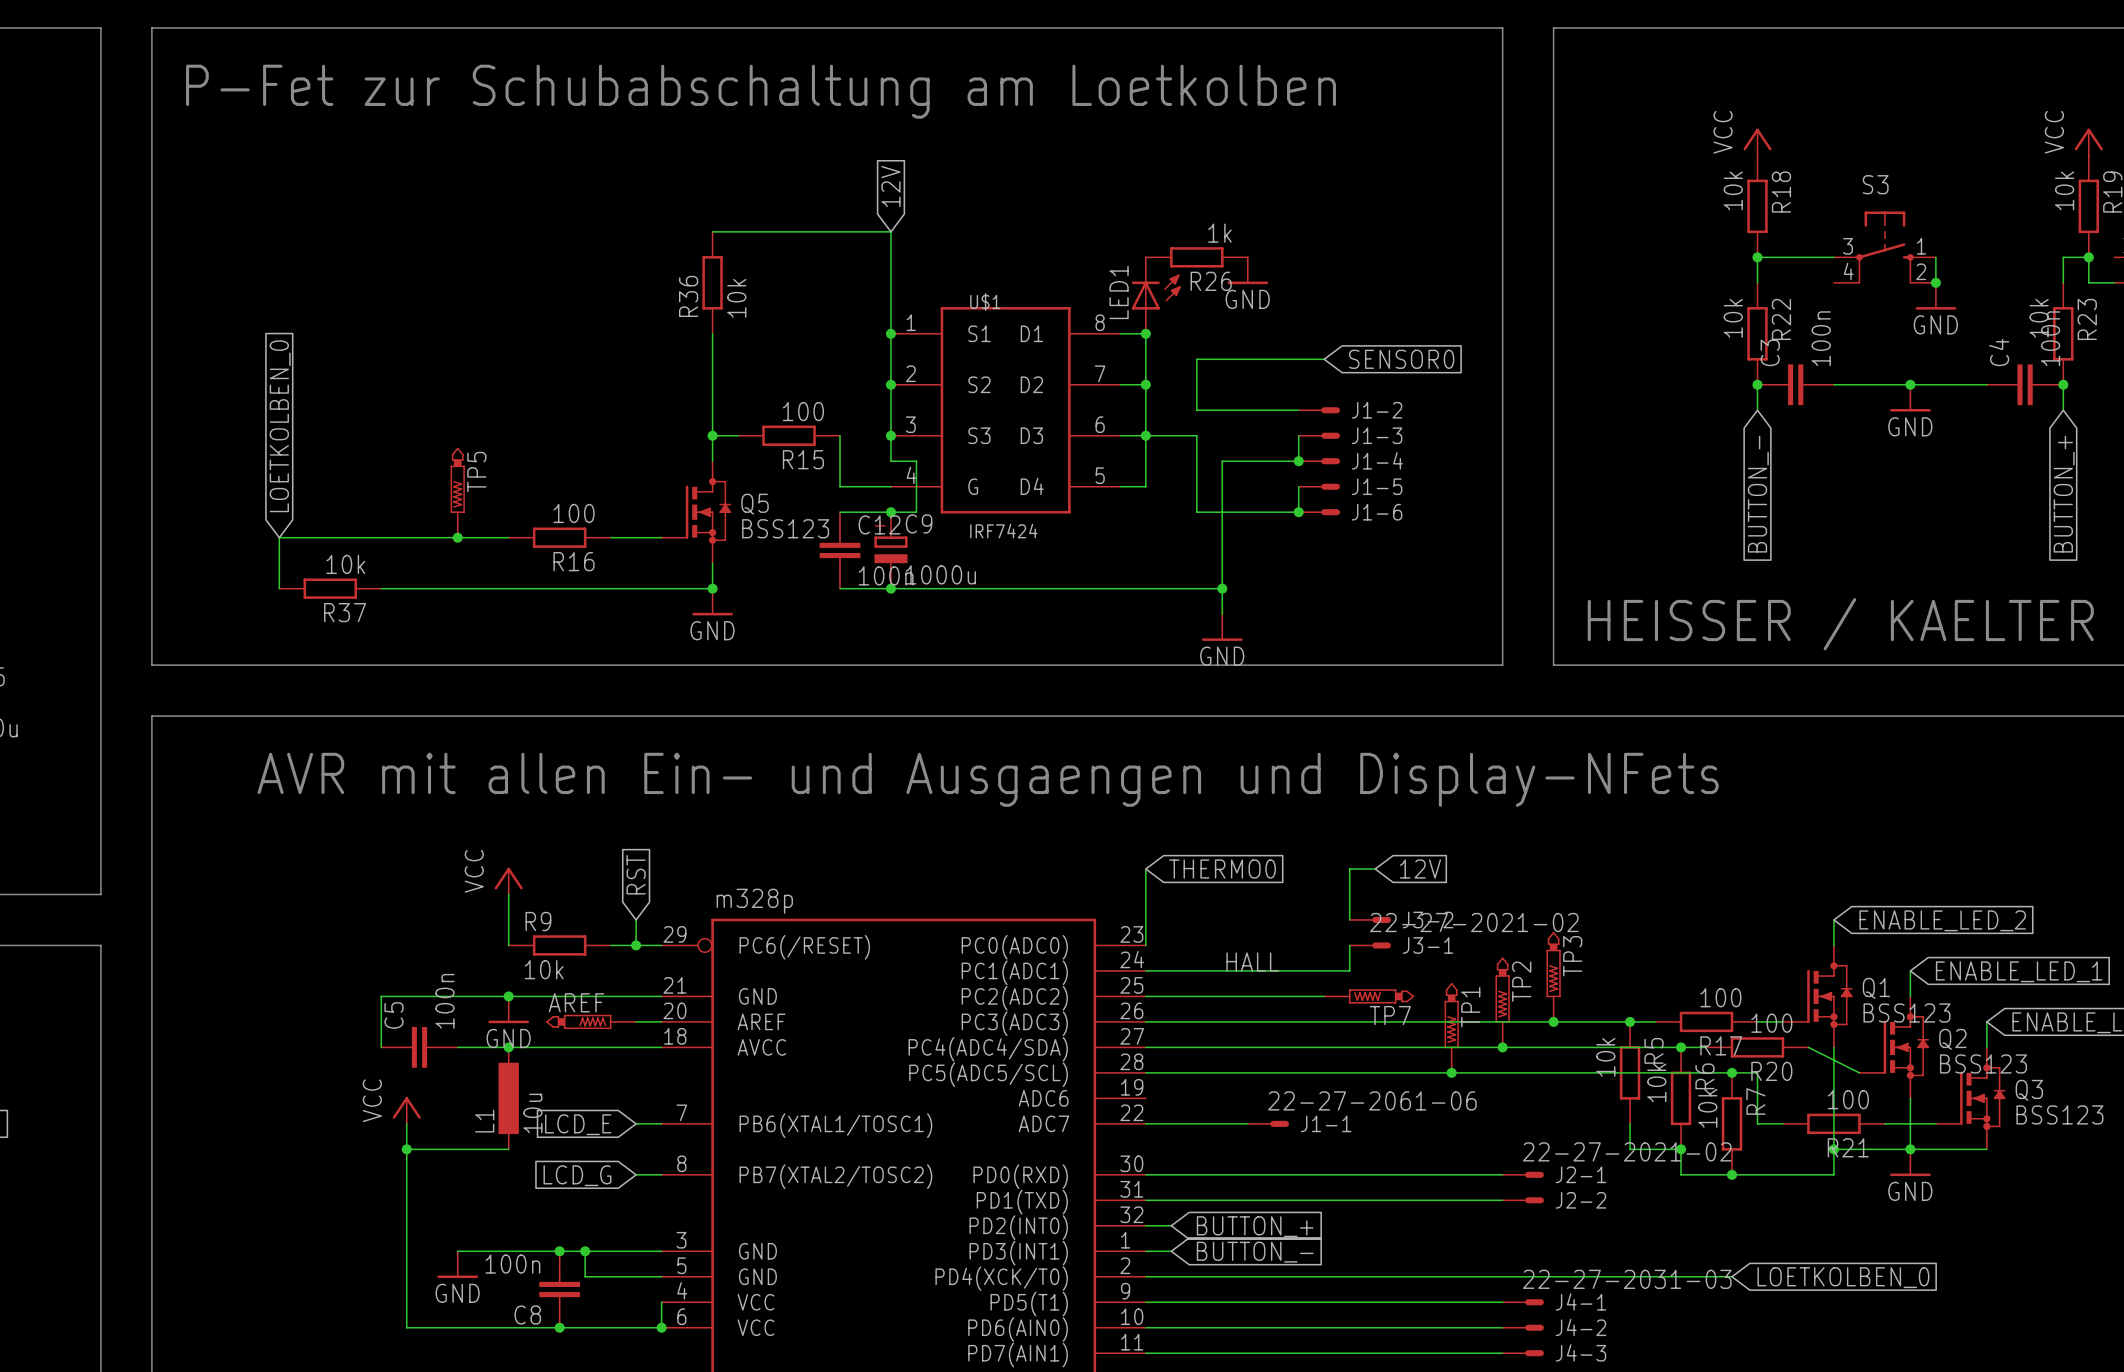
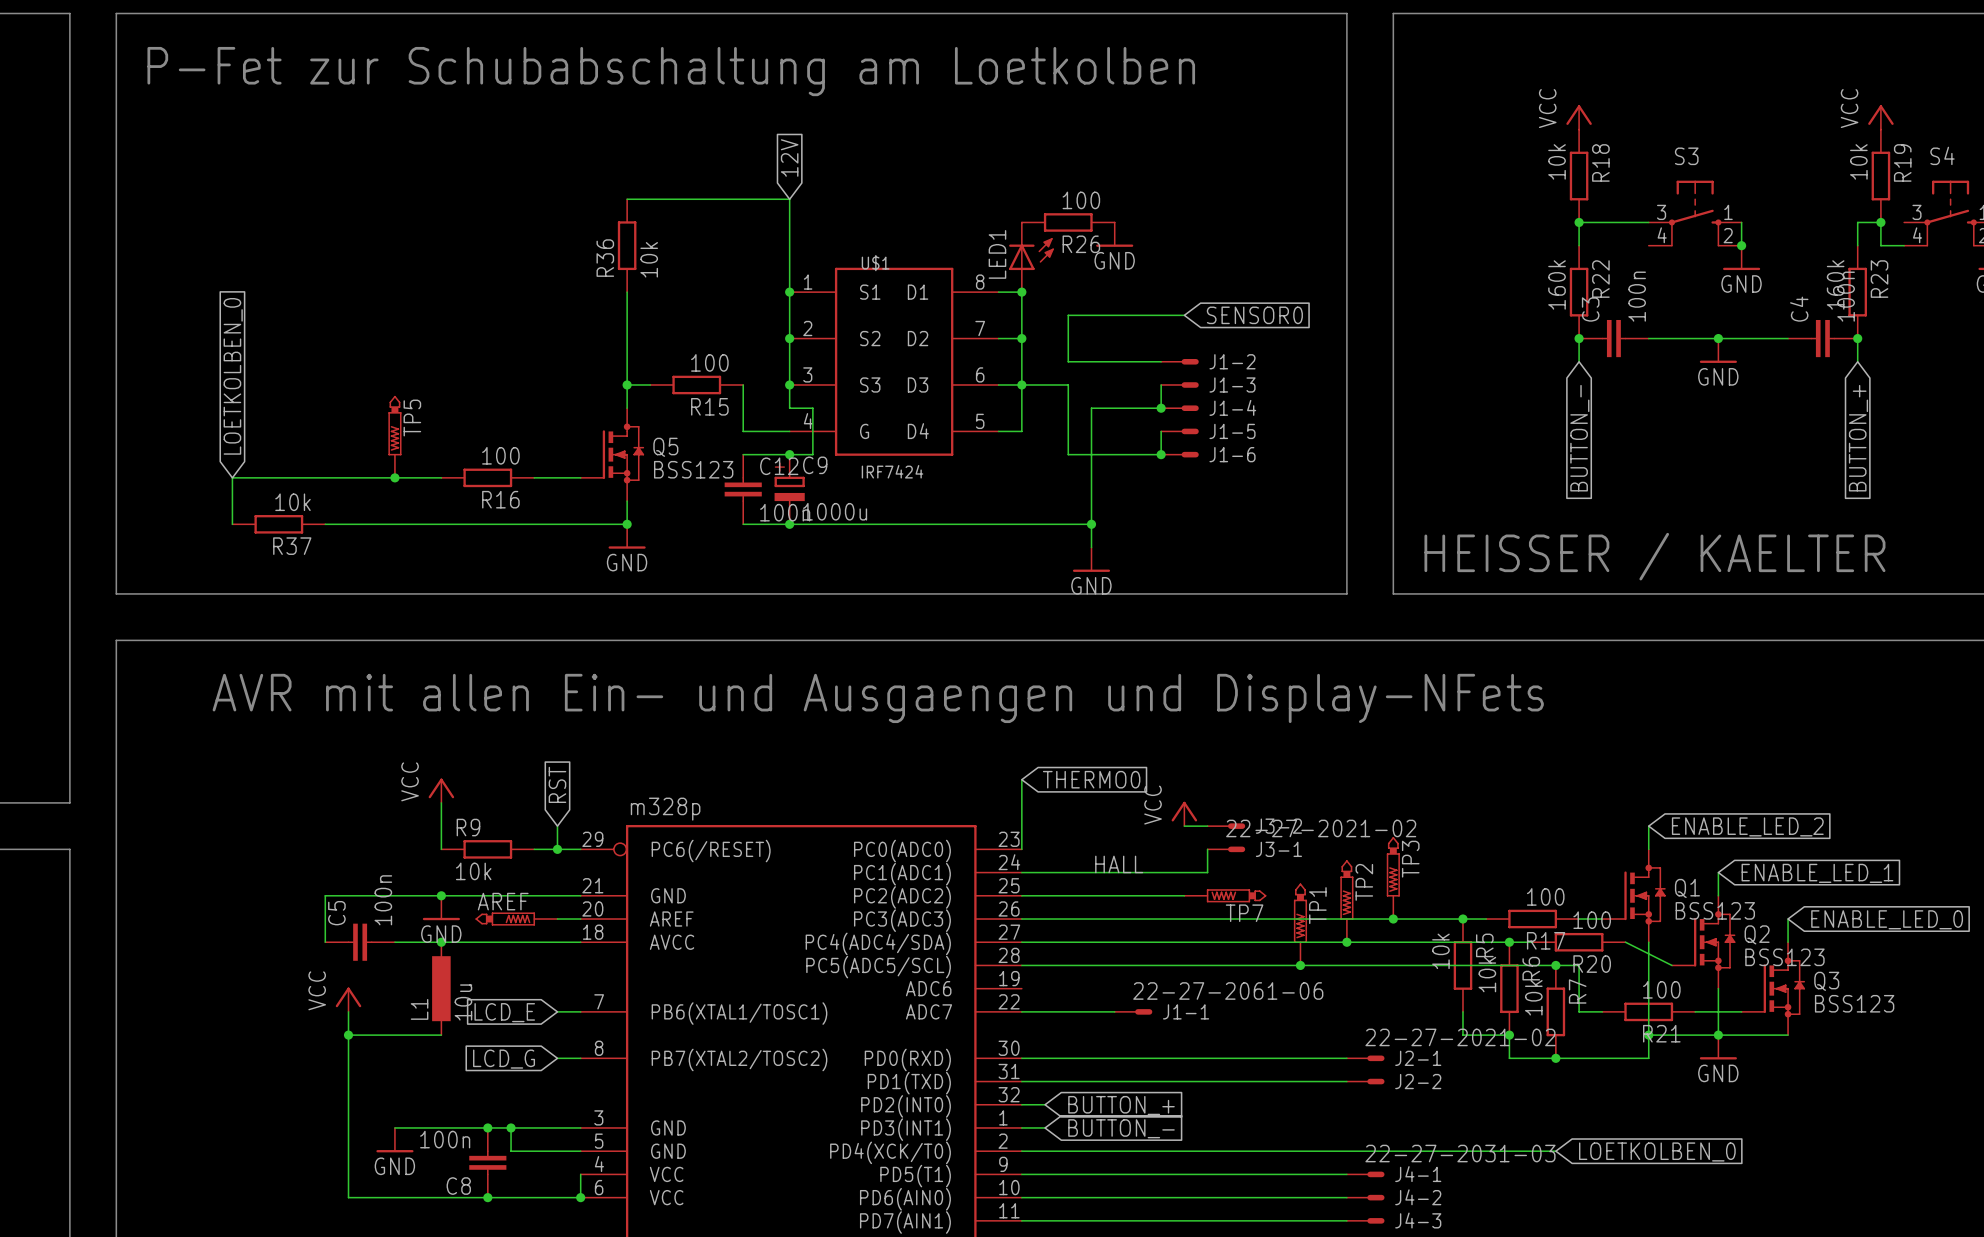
R26 value: 1k (1219, 233) -> 100 (1081, 200)
R22 value: 10k (1733, 318) -> 160k (1557, 284)
R23 value: 10k (2039, 318) -> 160k (1835, 284)
wire: (1375, 869) (1349, 869) (1349, 919) -> (1184, 826) (1207, 826)
global label: 12V (1420, 869) -> none
power symbol: none -> VCC (1184, 813)

